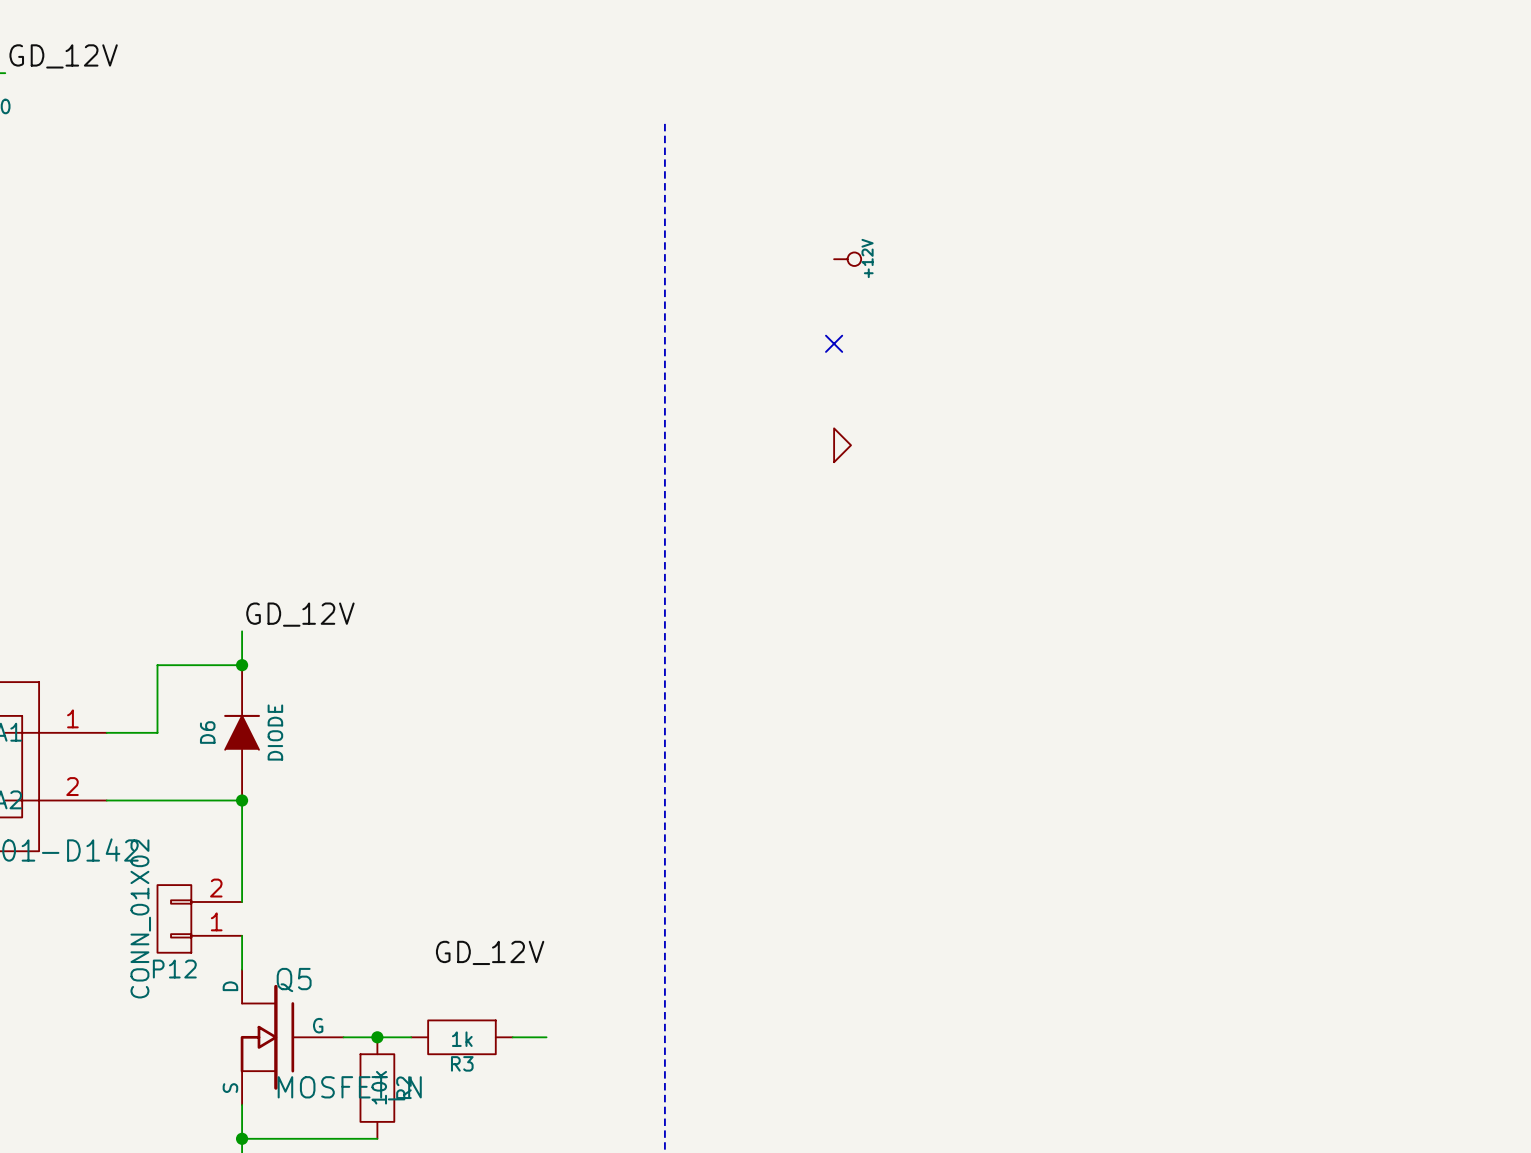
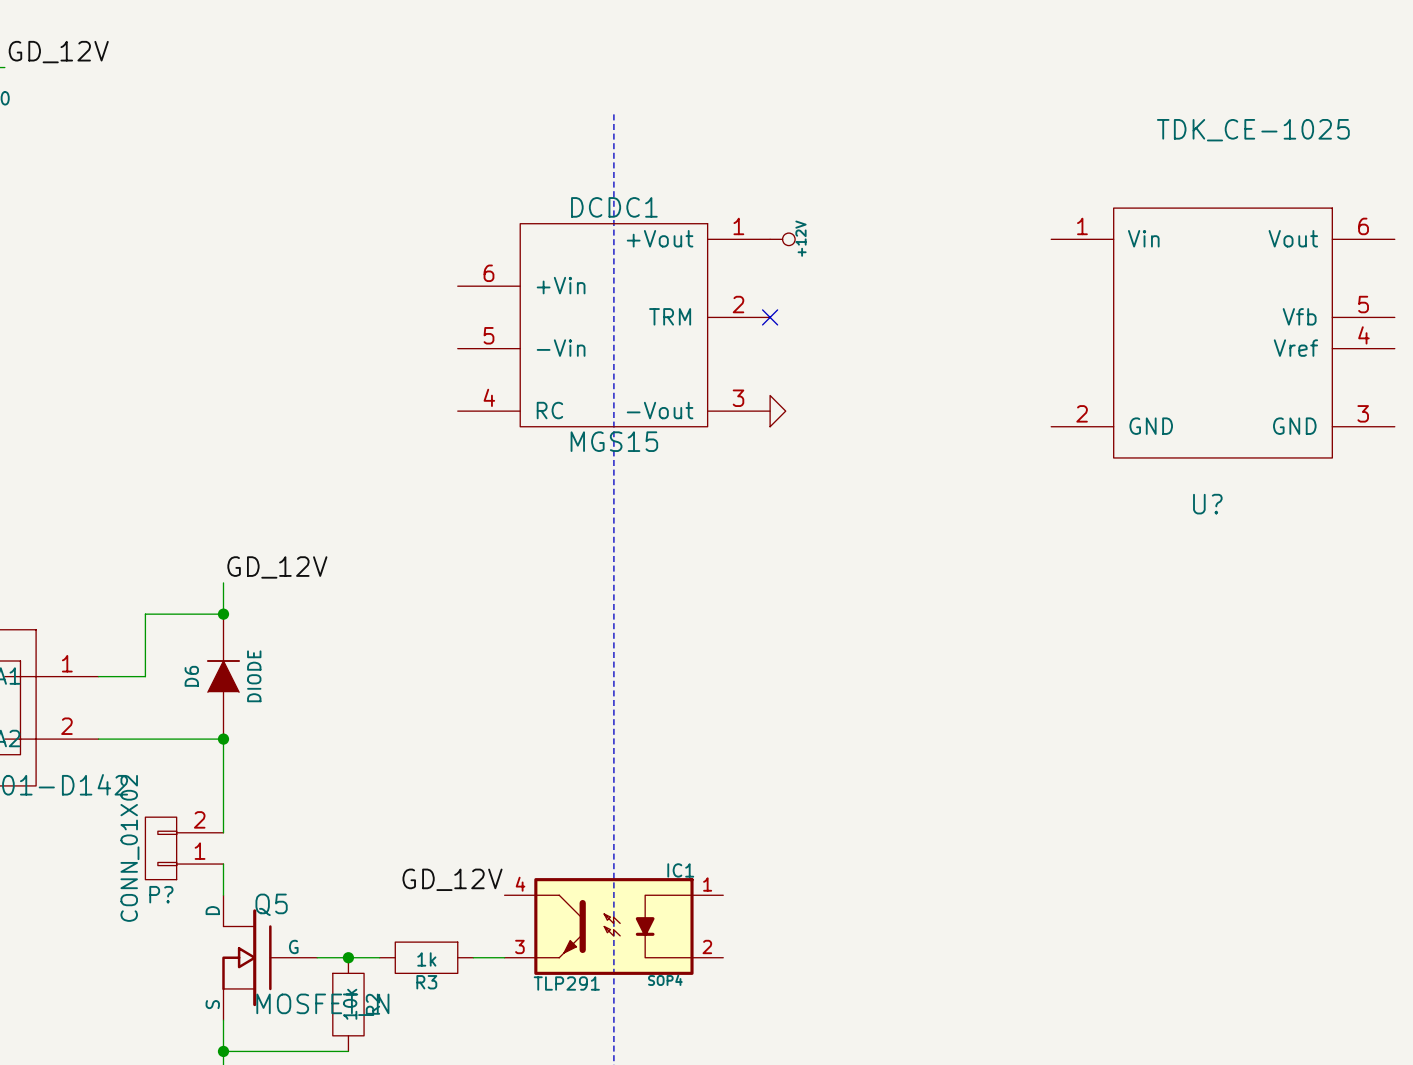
DCDC1: none -> MGS15 (613, 325)
U?: none -> TDK_CE-1025 (1223, 333)
P12 name: P12 (174, 969) -> P? (161, 894)
IC1: none -> TLP291 (613, 926)

